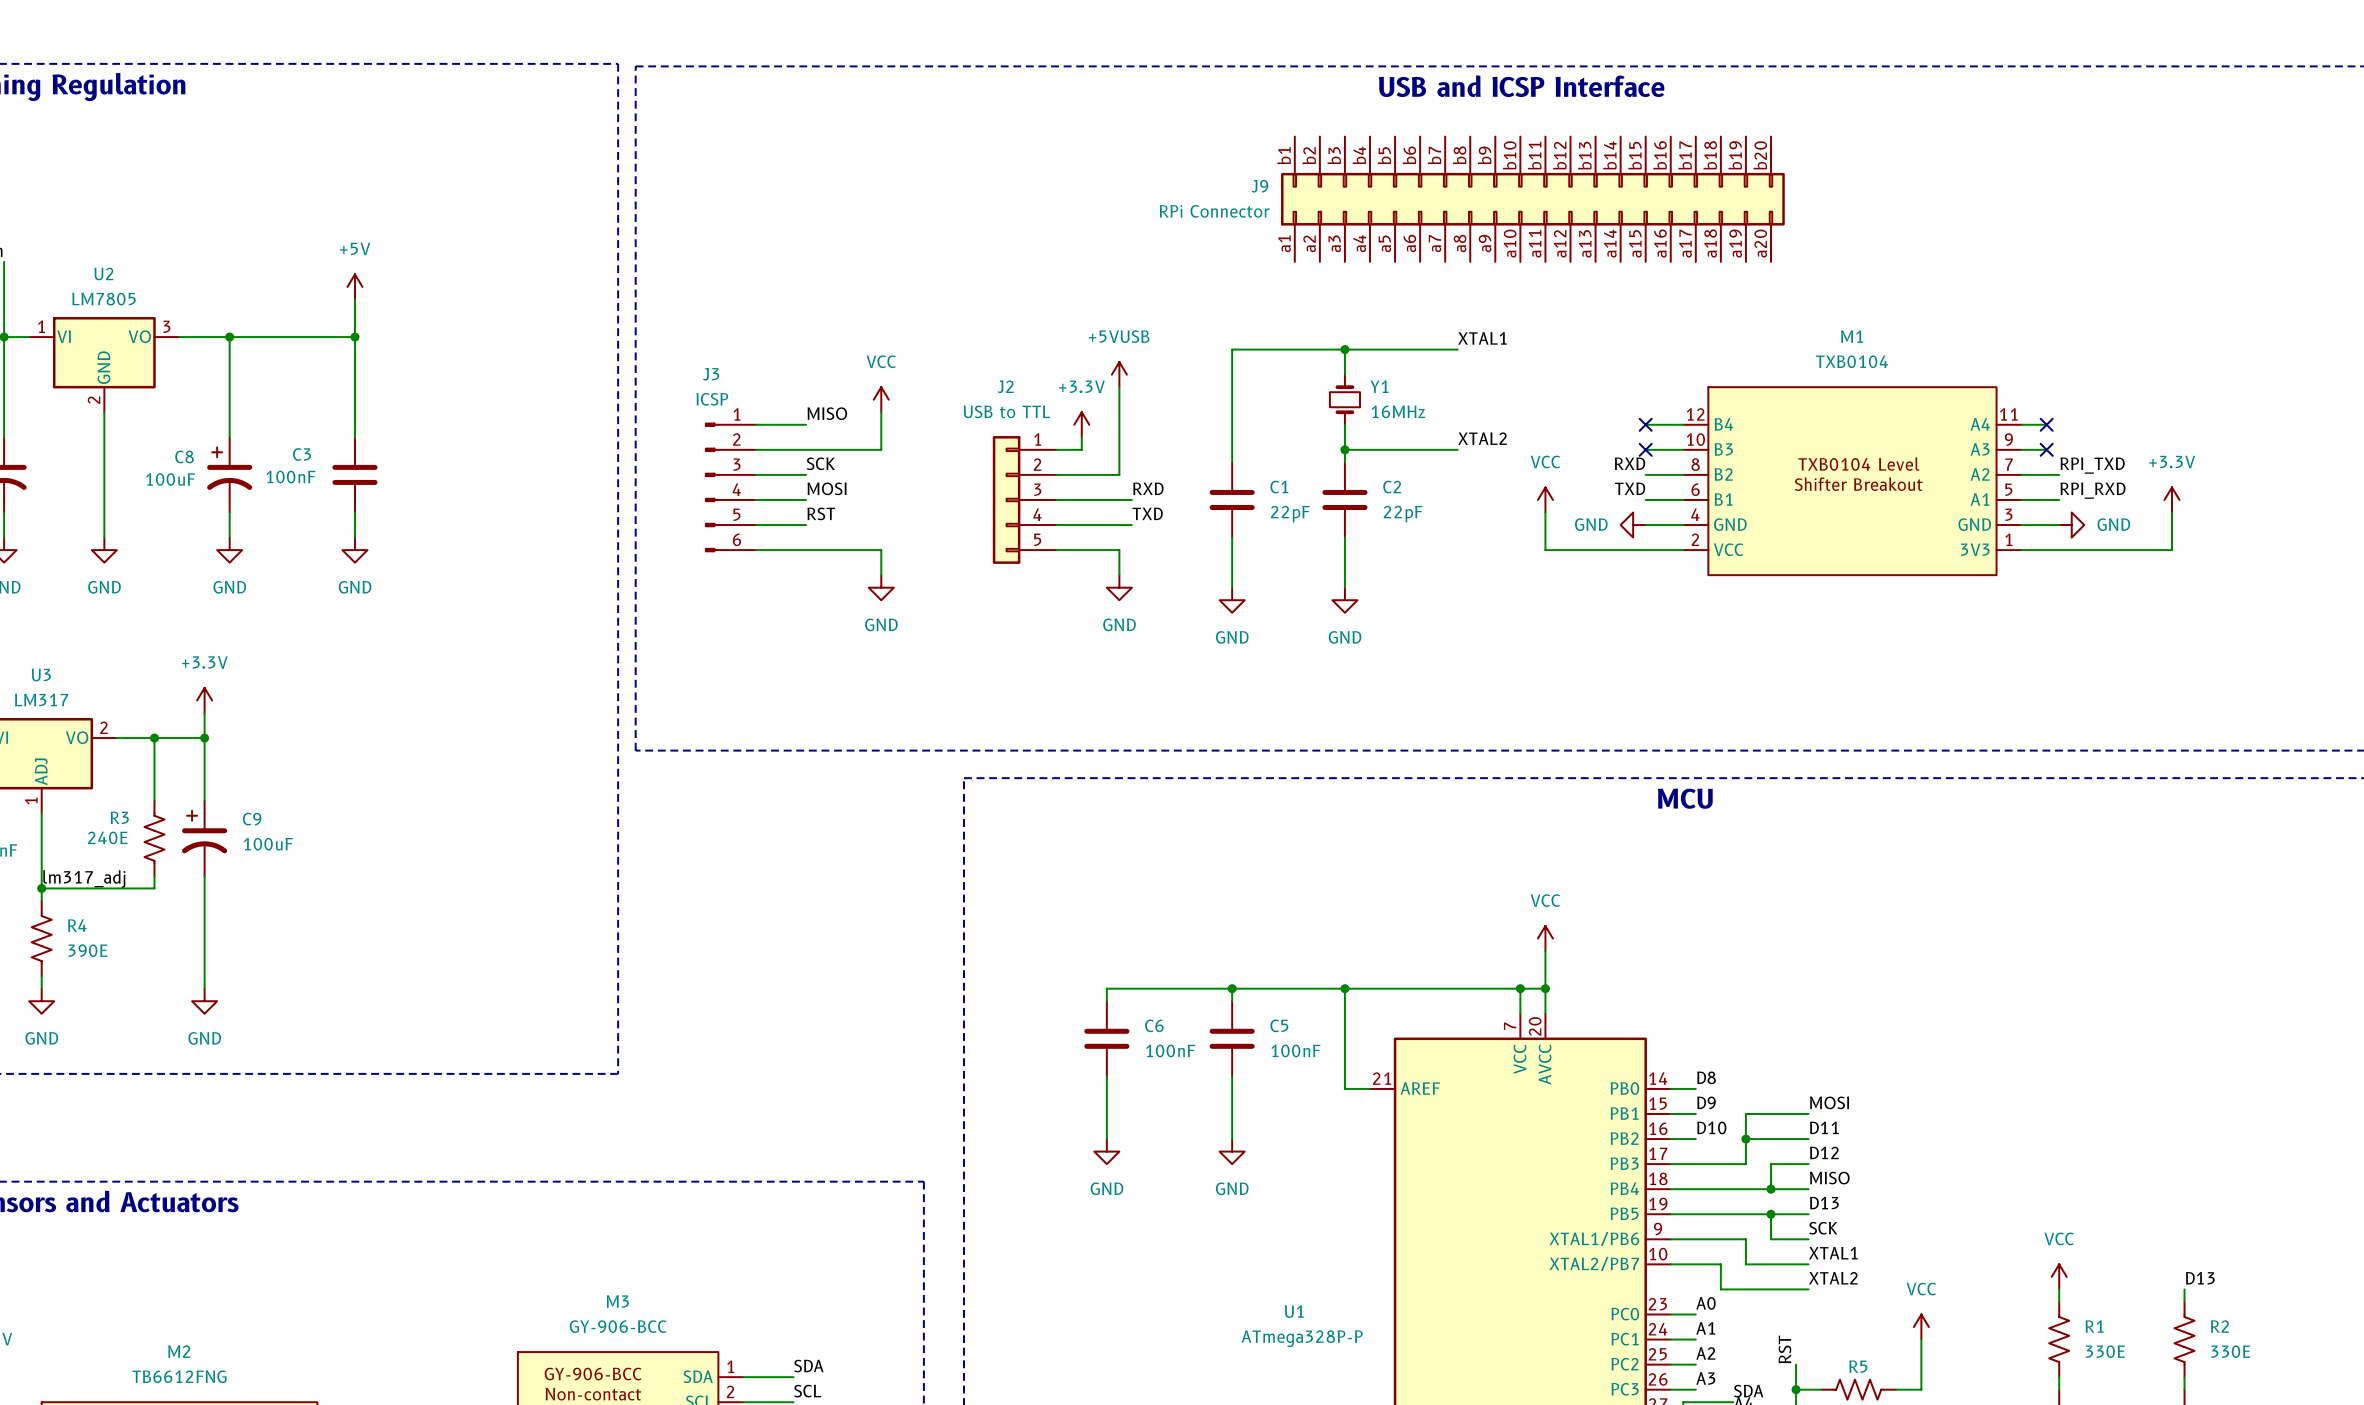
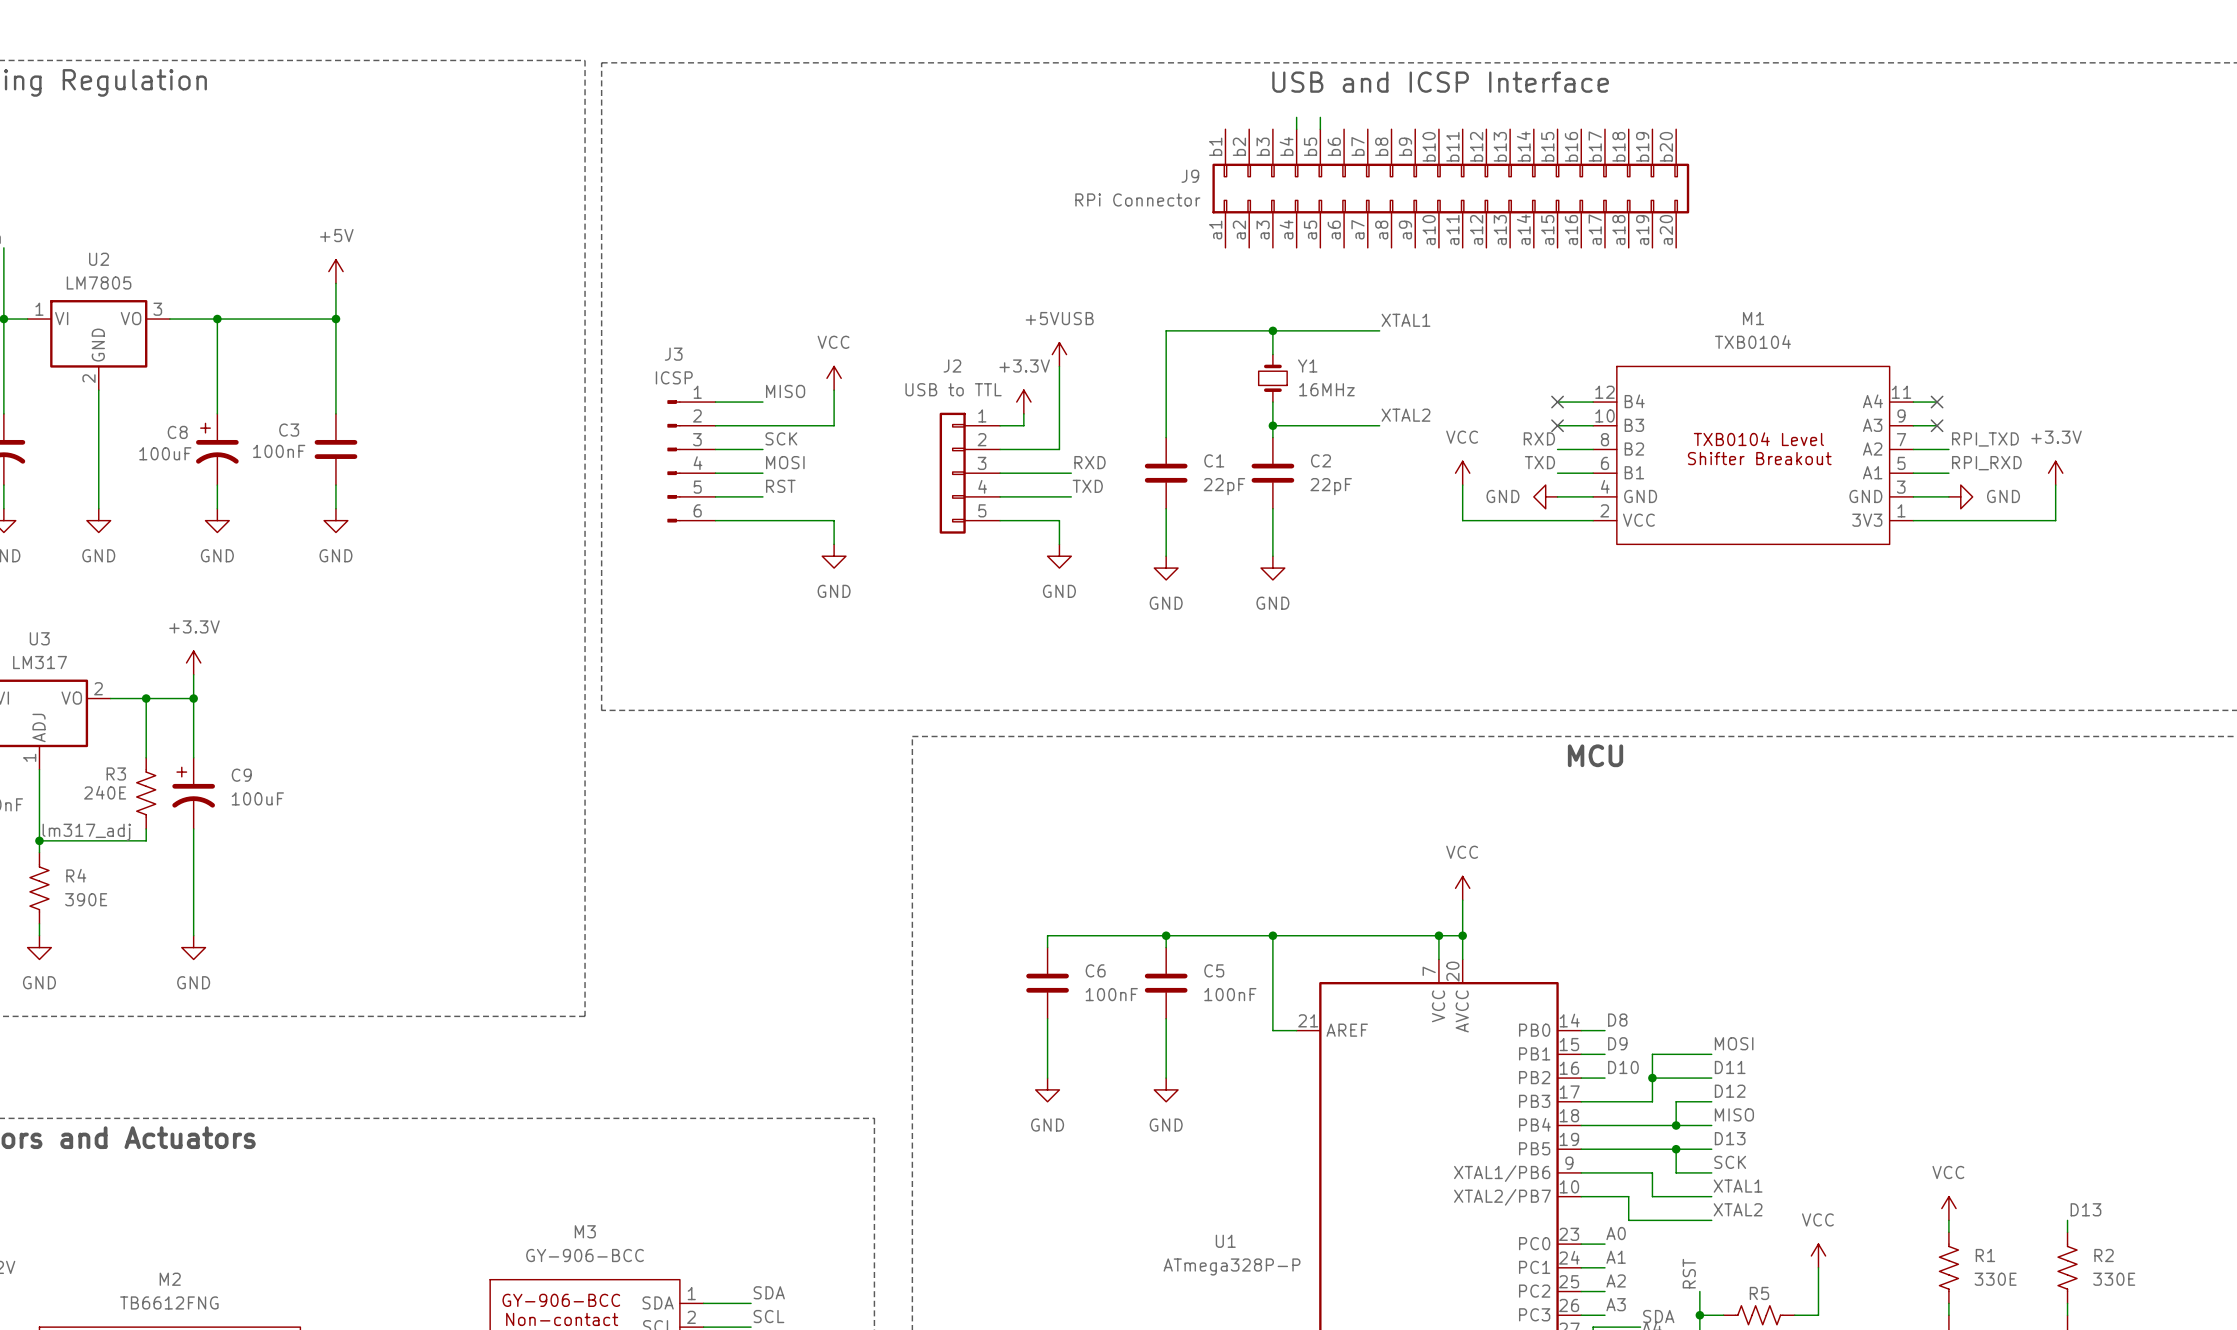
wire: none -> (1296, 117) (1296, 129)
wire: none -> (1320, 117) (1320, 129)

